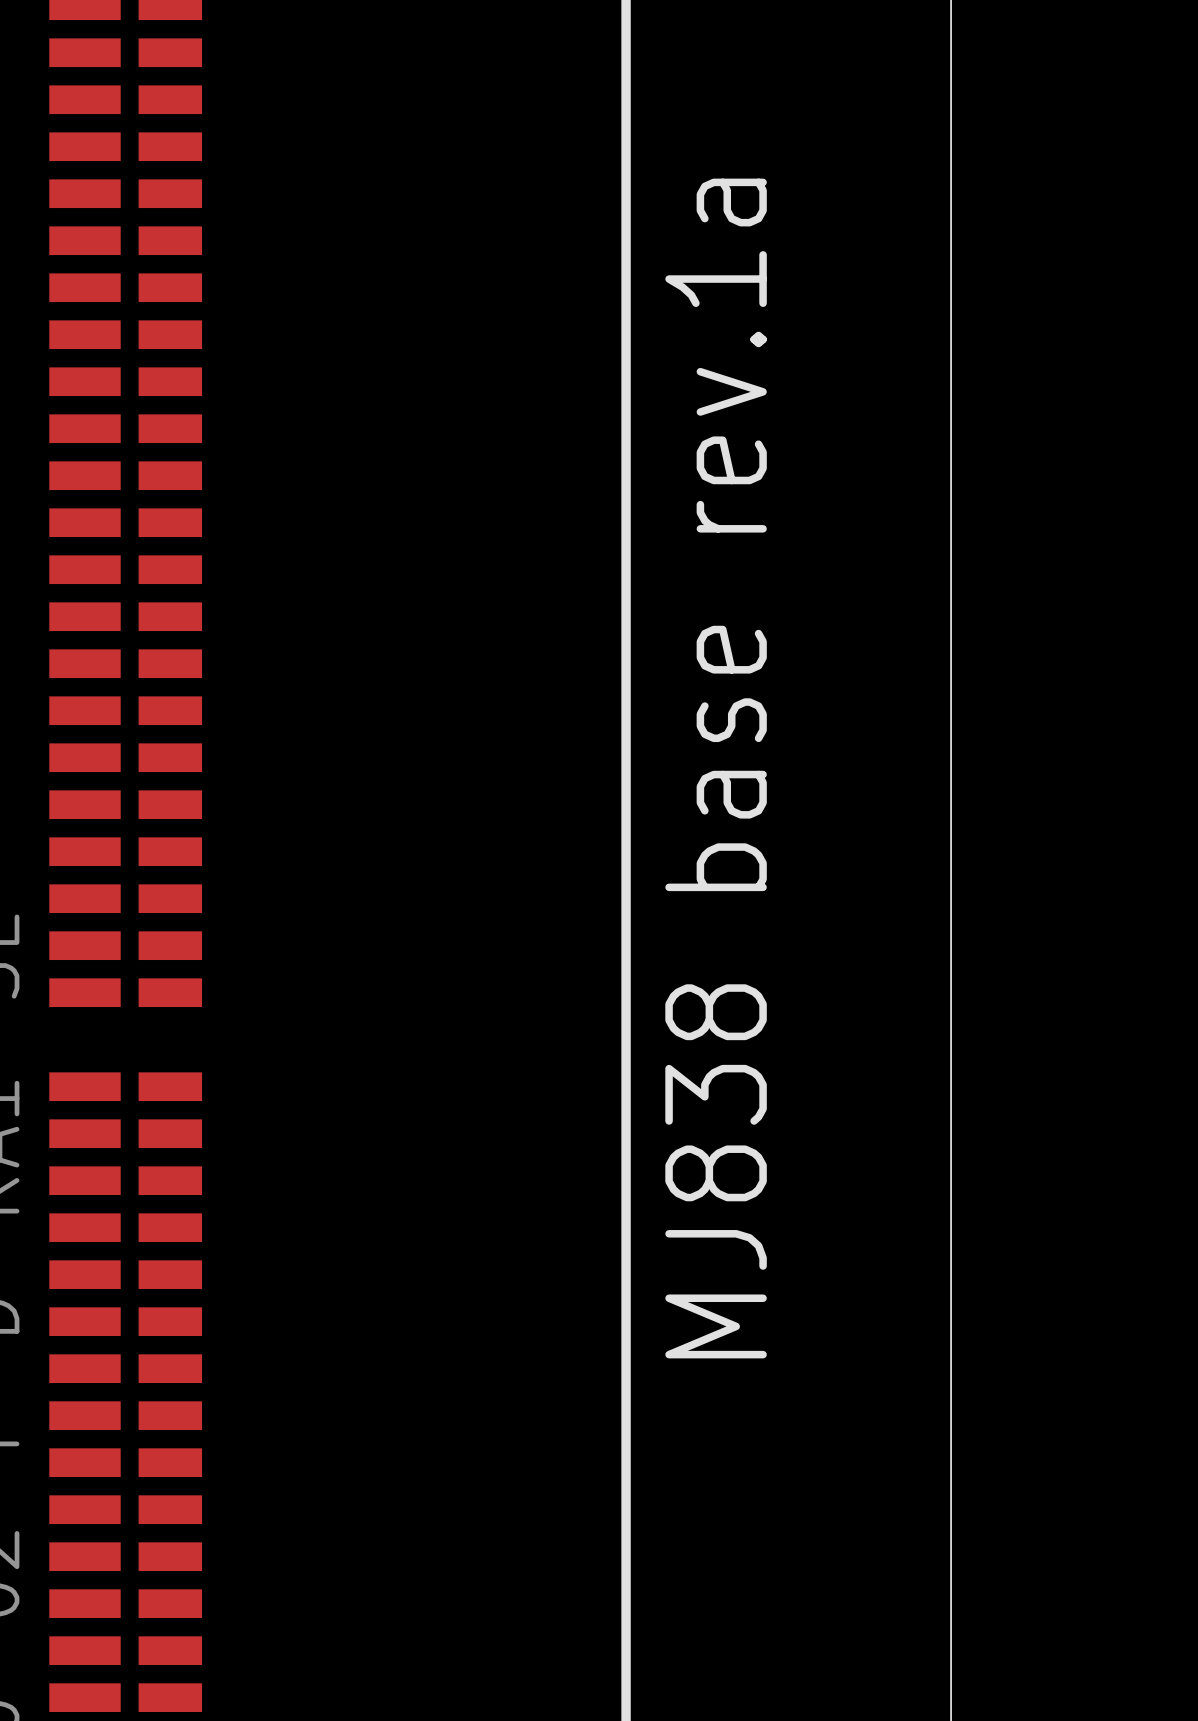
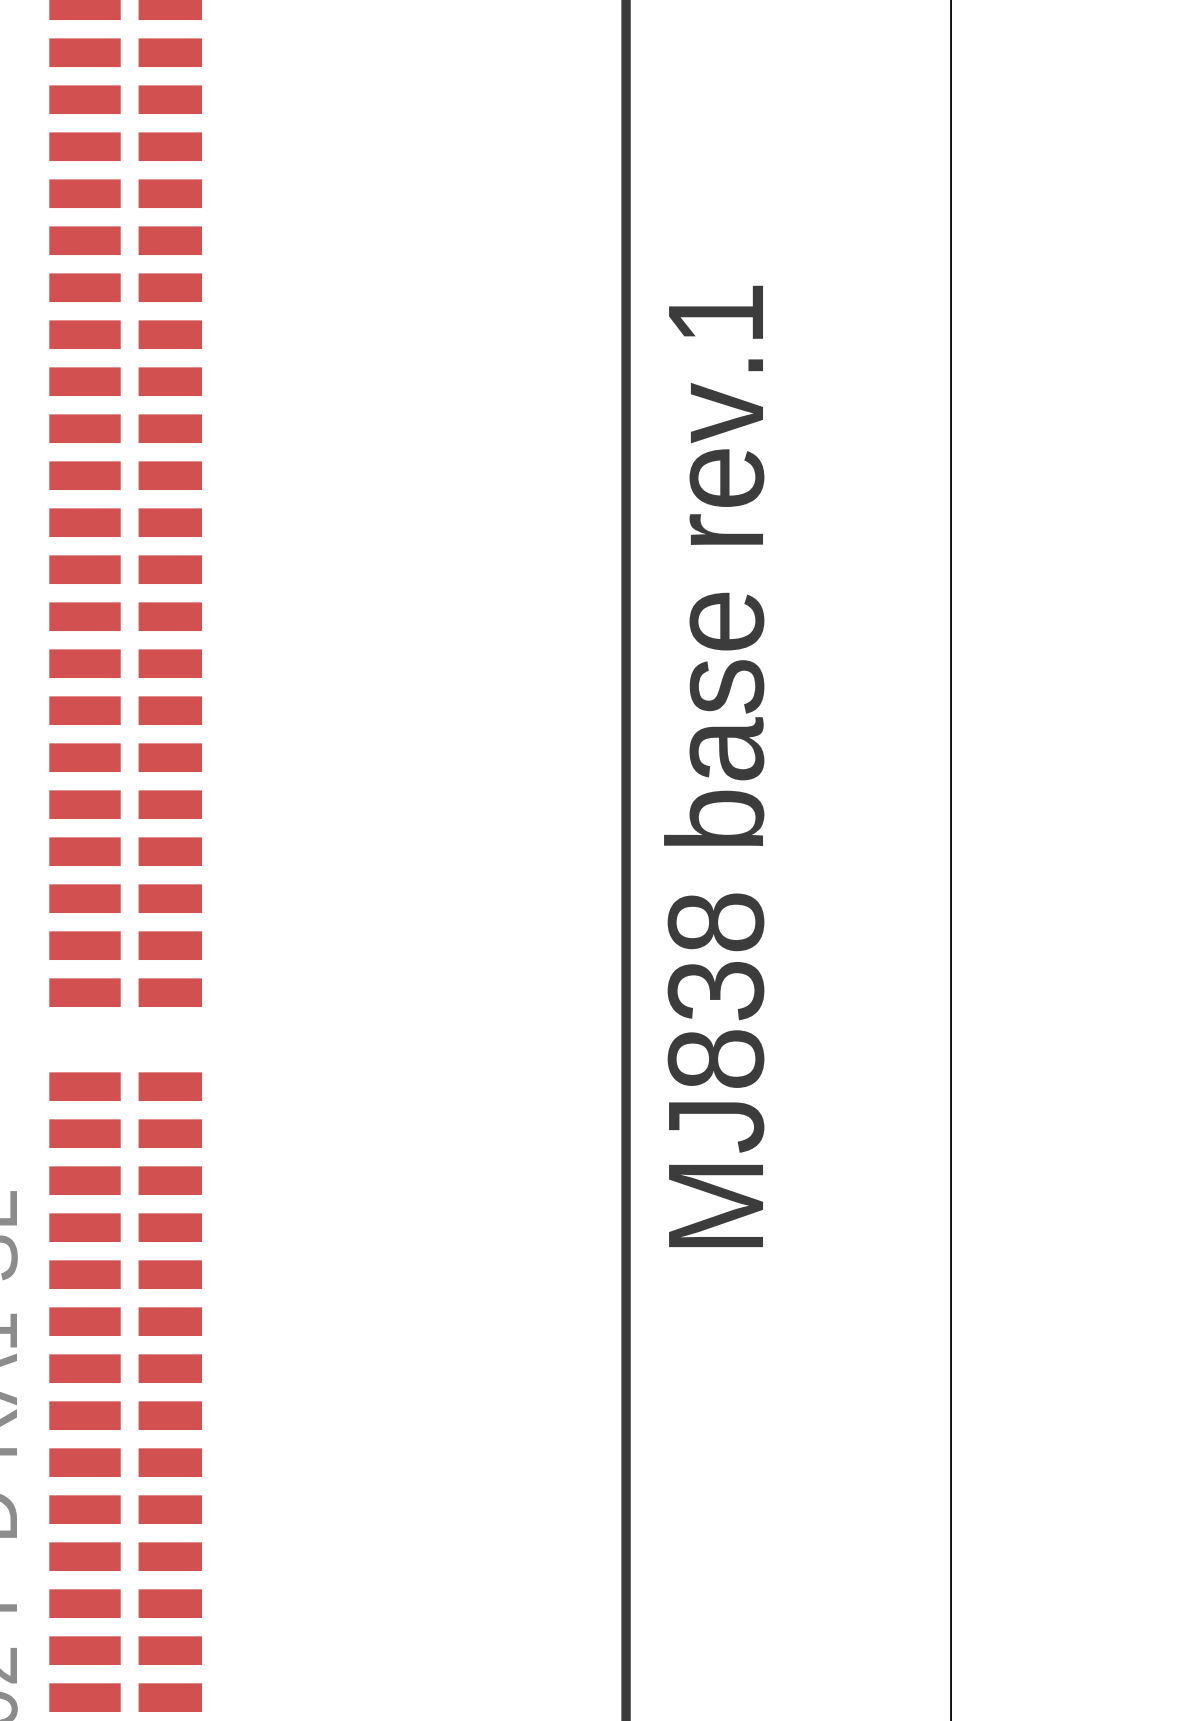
text: MJ838 base rev.1a (716, 768) -> MJ838 base rev.1 (714, 766)

